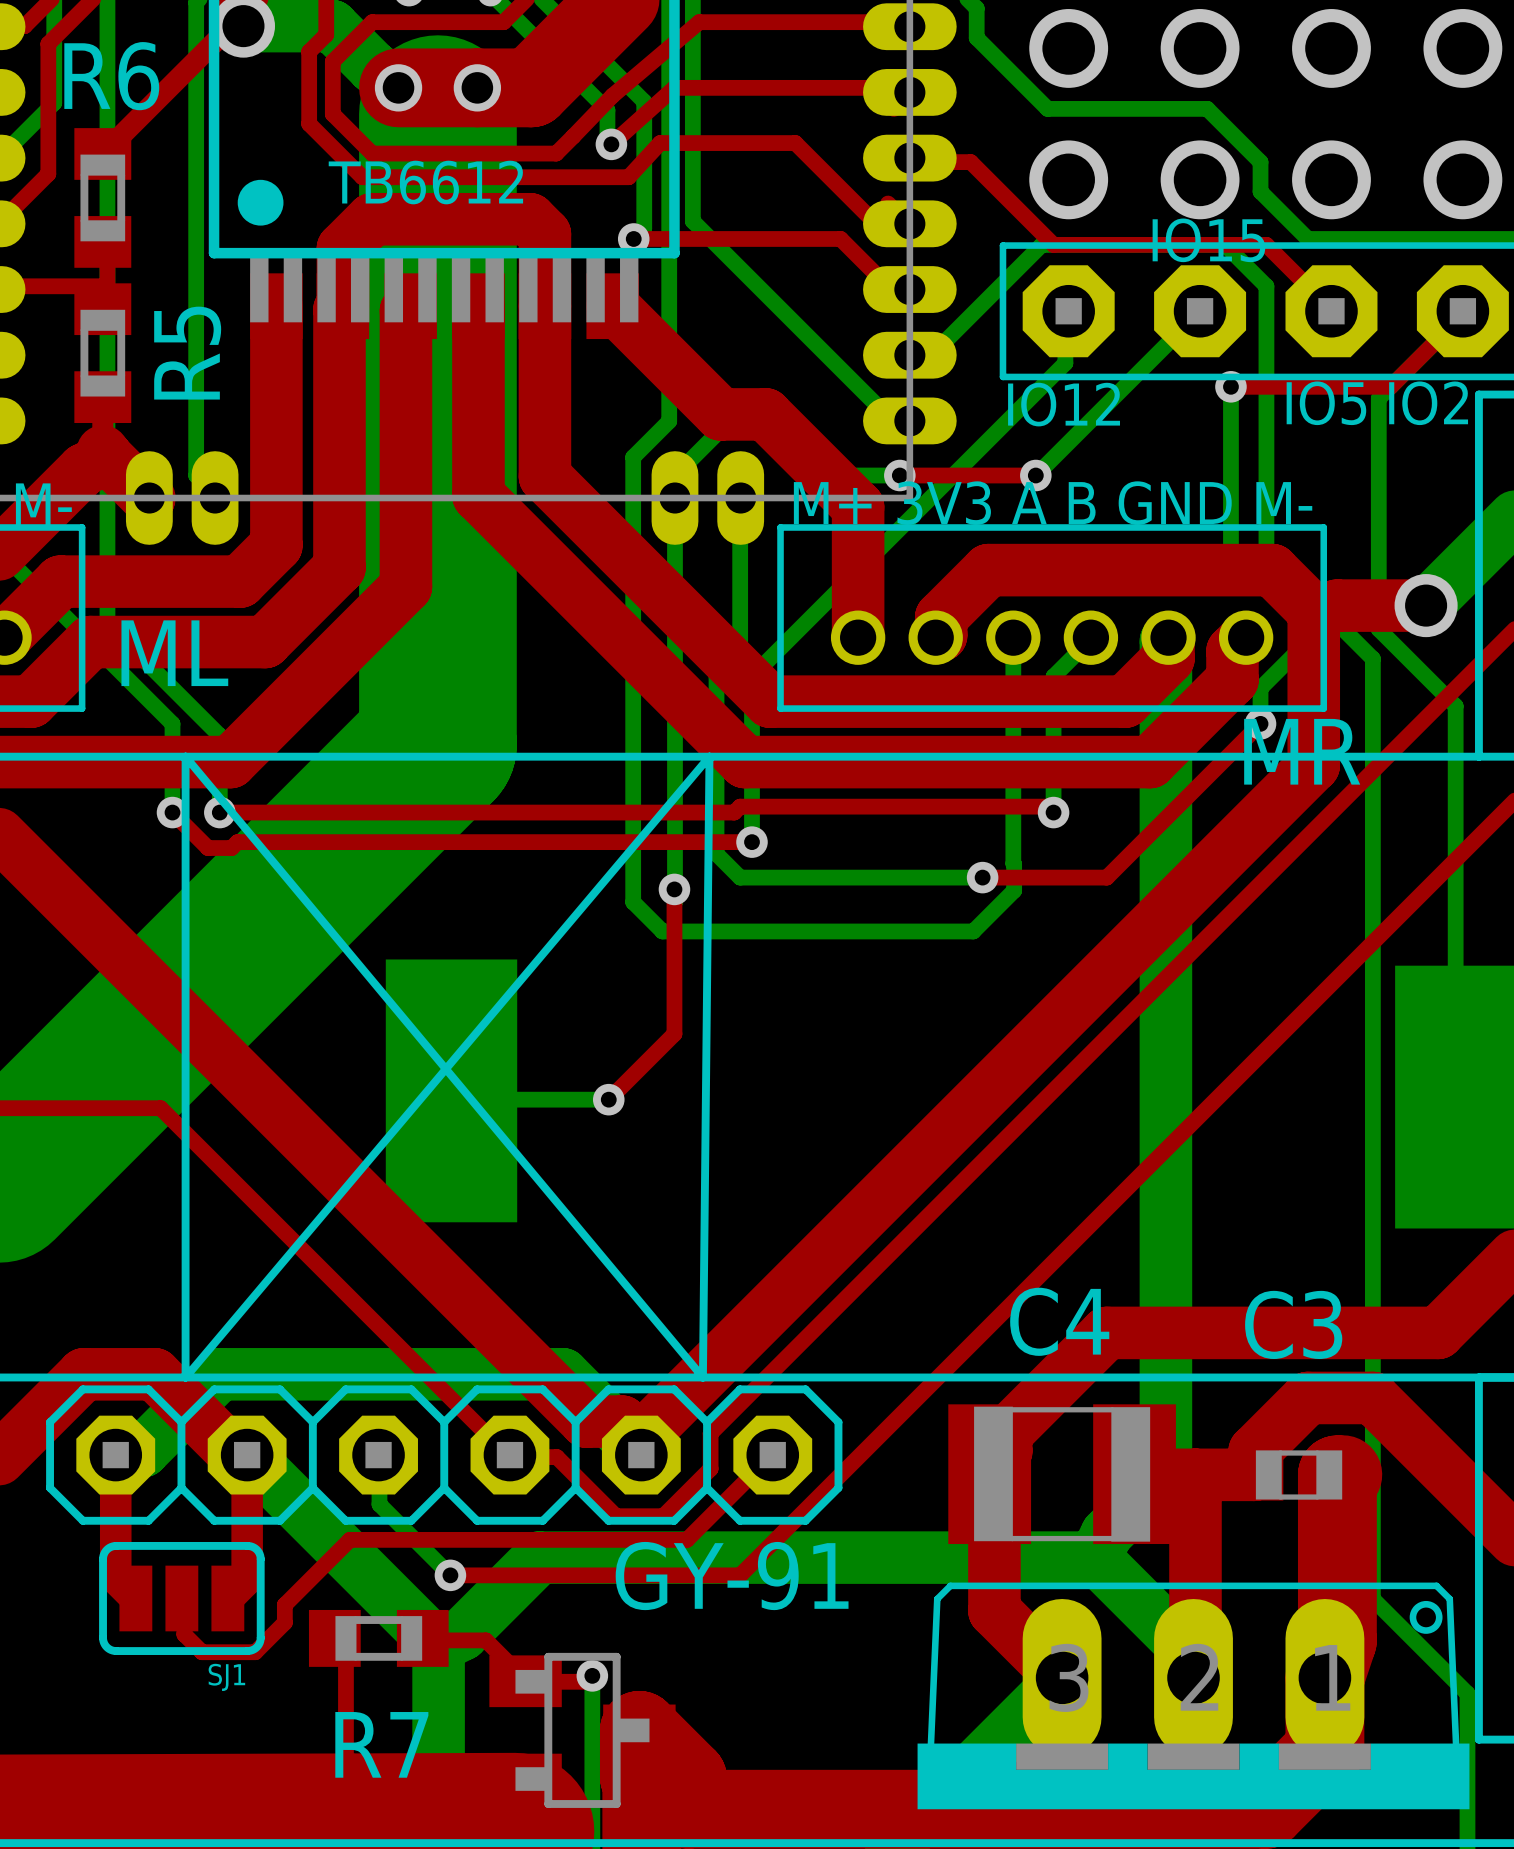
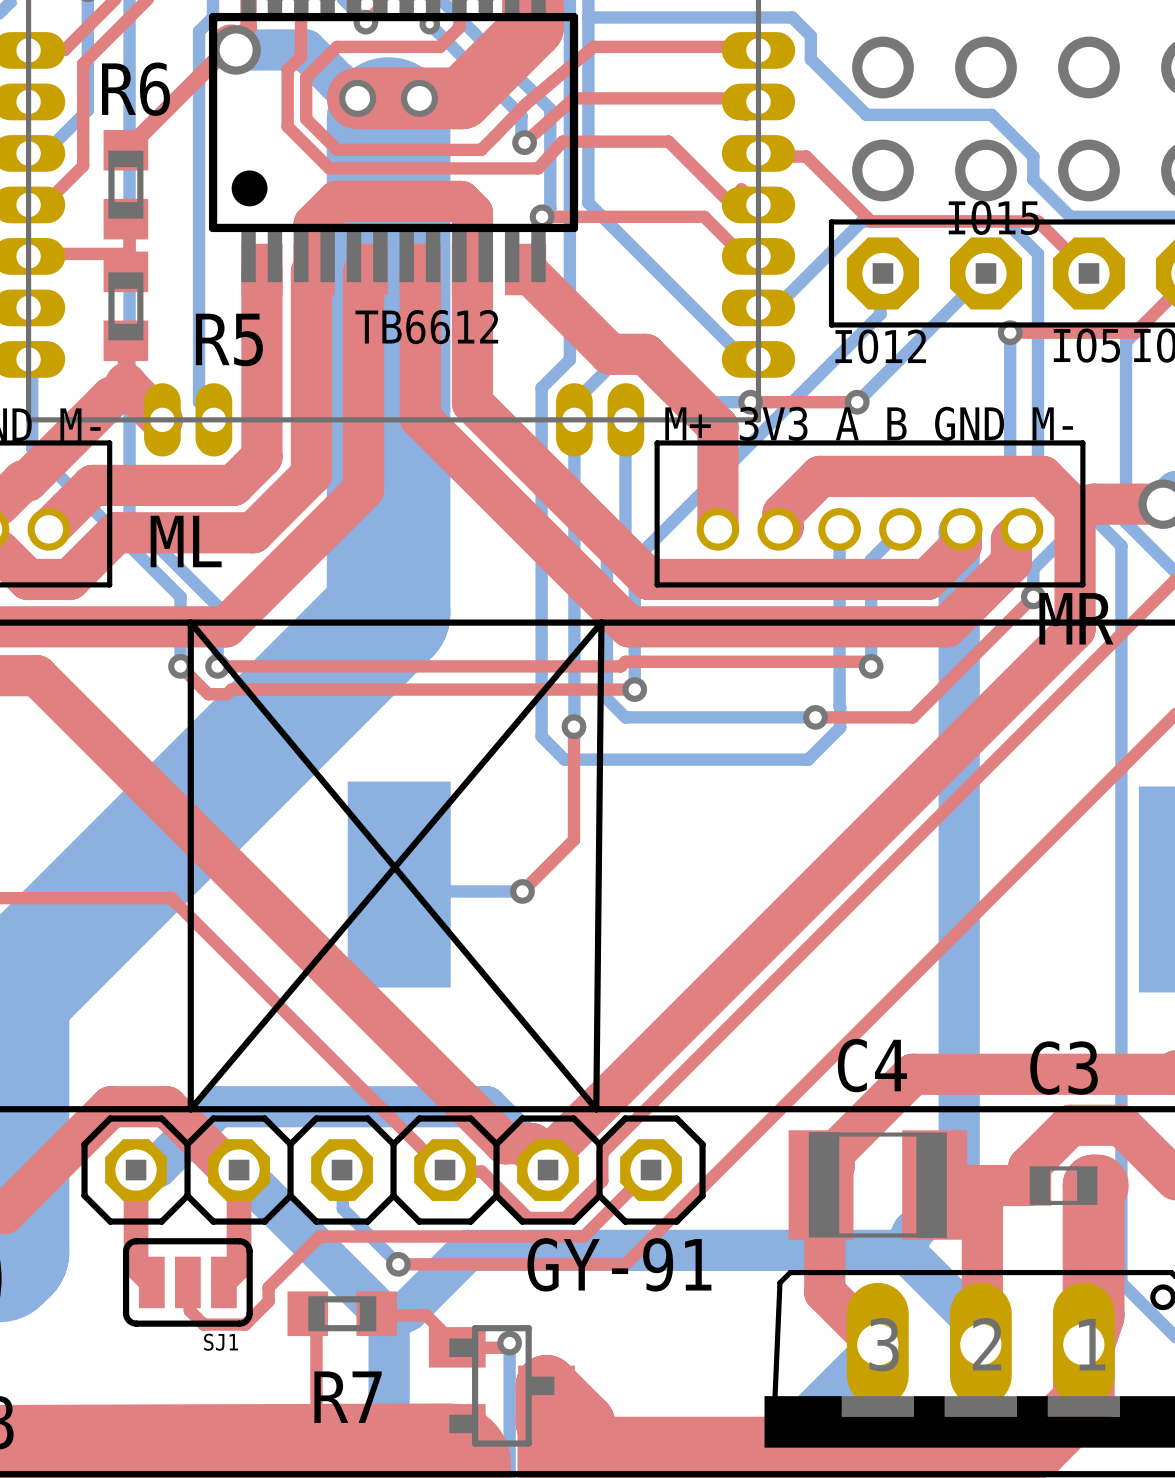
text position: TB6612 (425, 182) -> TB6612 (426, 327)
R5 name rotation: 0° (187, 353) -> 90° clockwise (229, 339)

